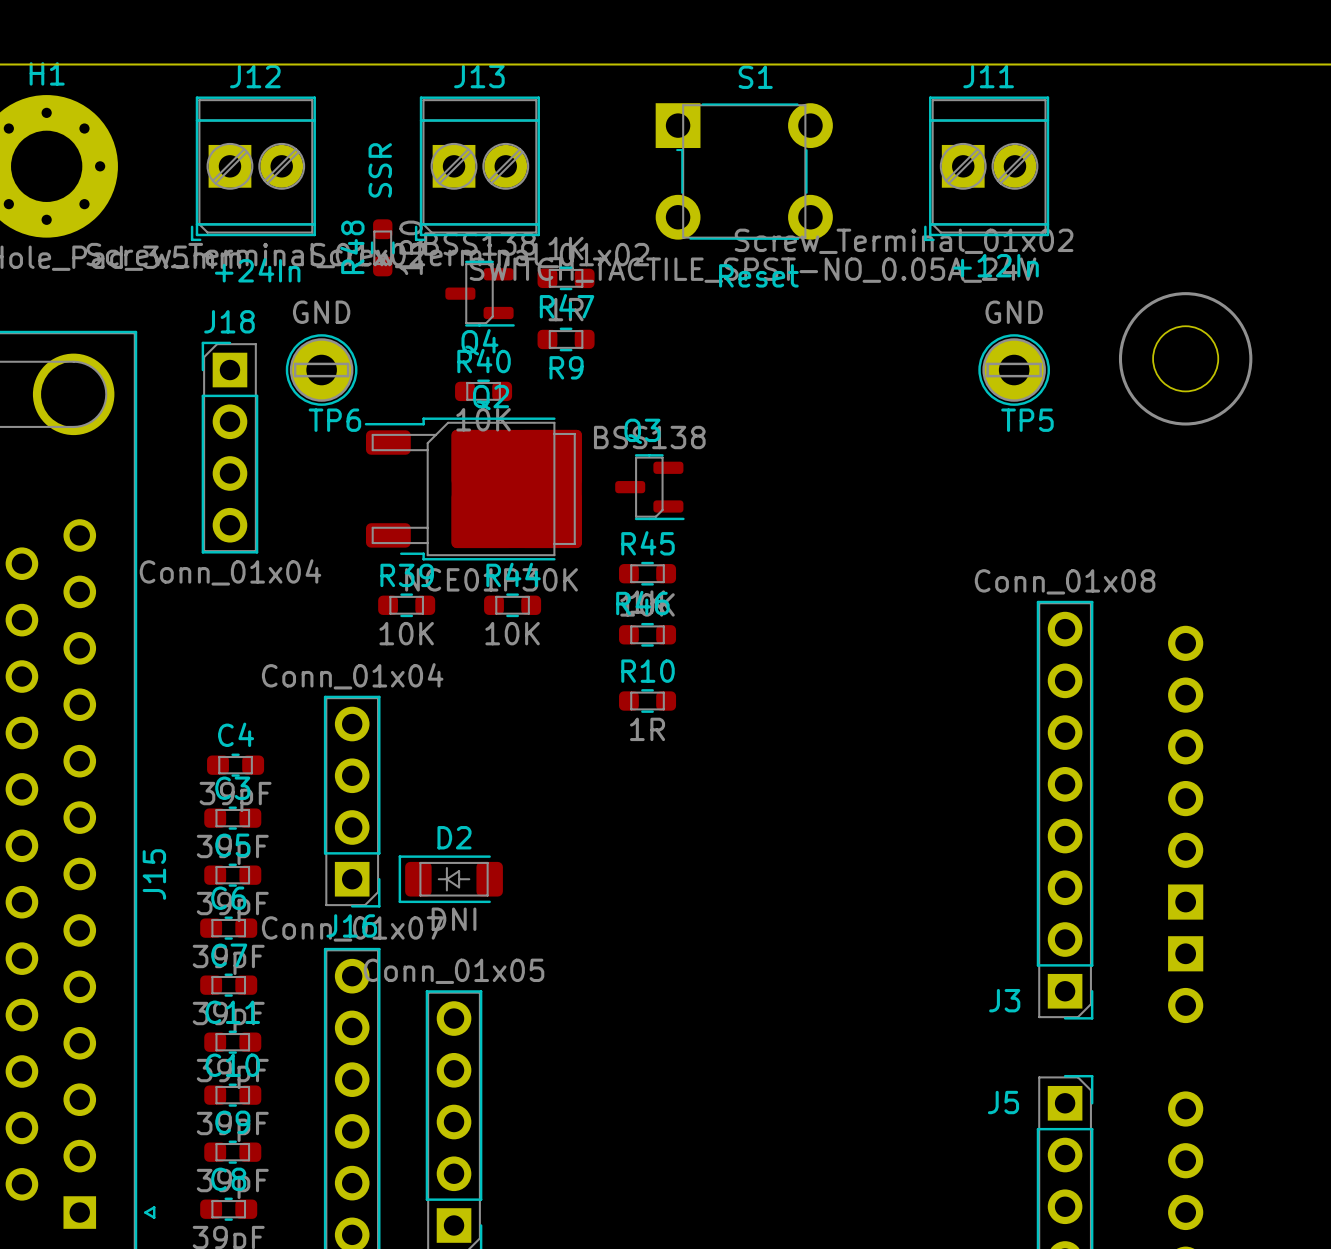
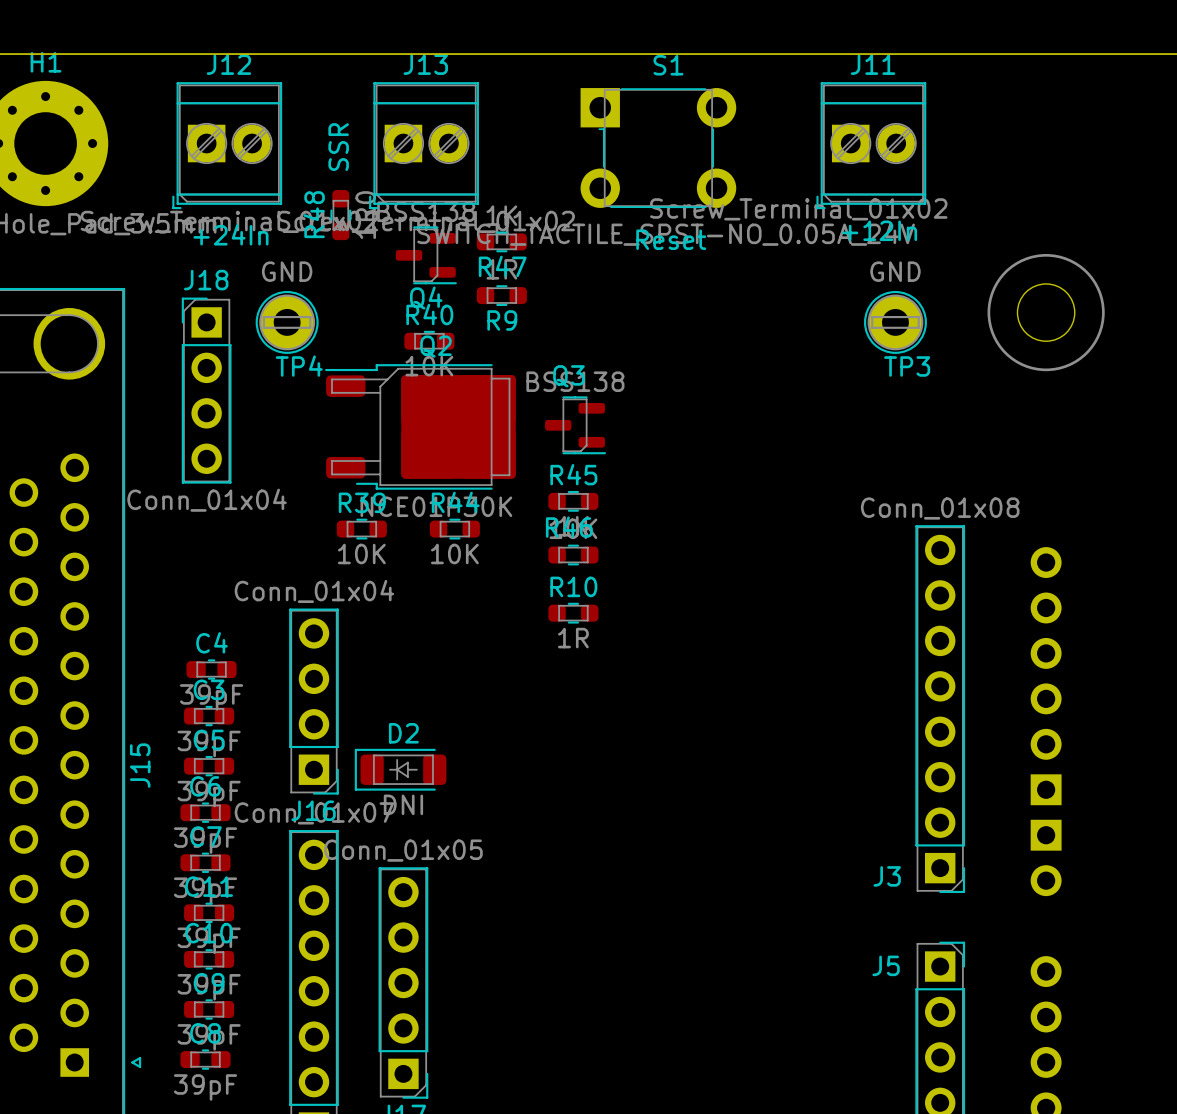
TP6 name: TP6 (334, 420) -> TP4 (299, 366)
TP5 name: TP5 (1027, 420) -> TP3 (907, 366)

